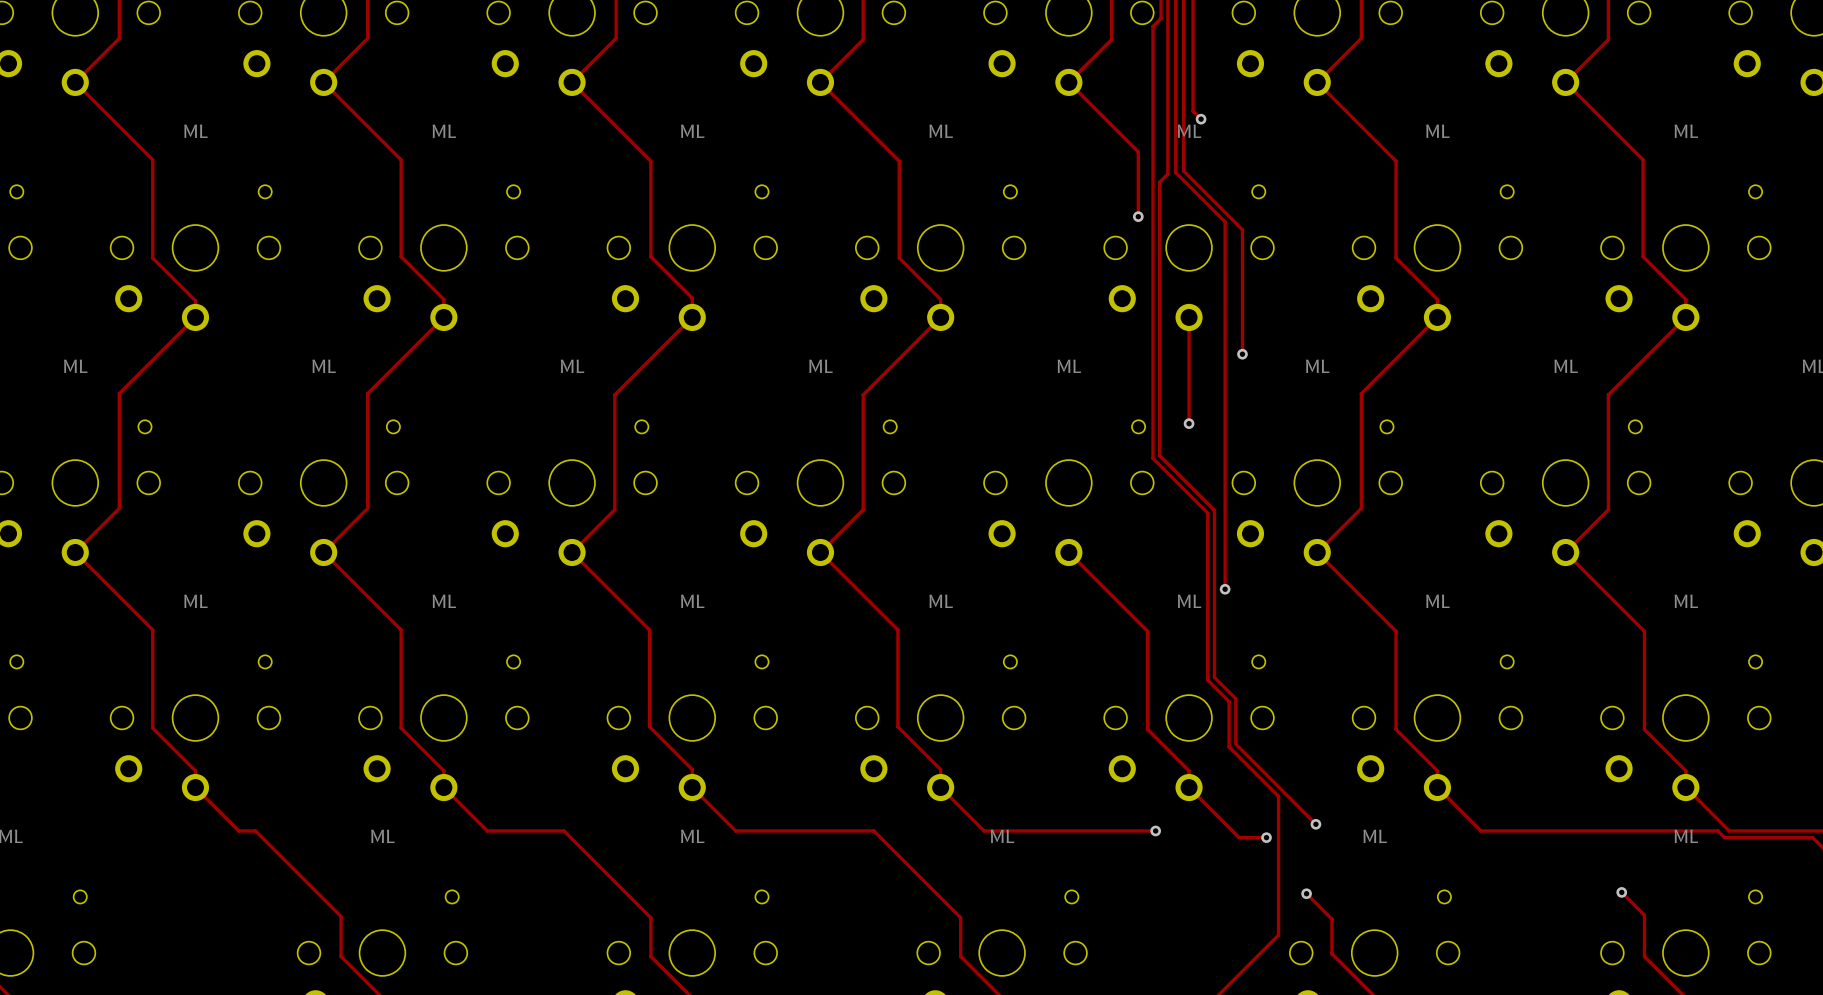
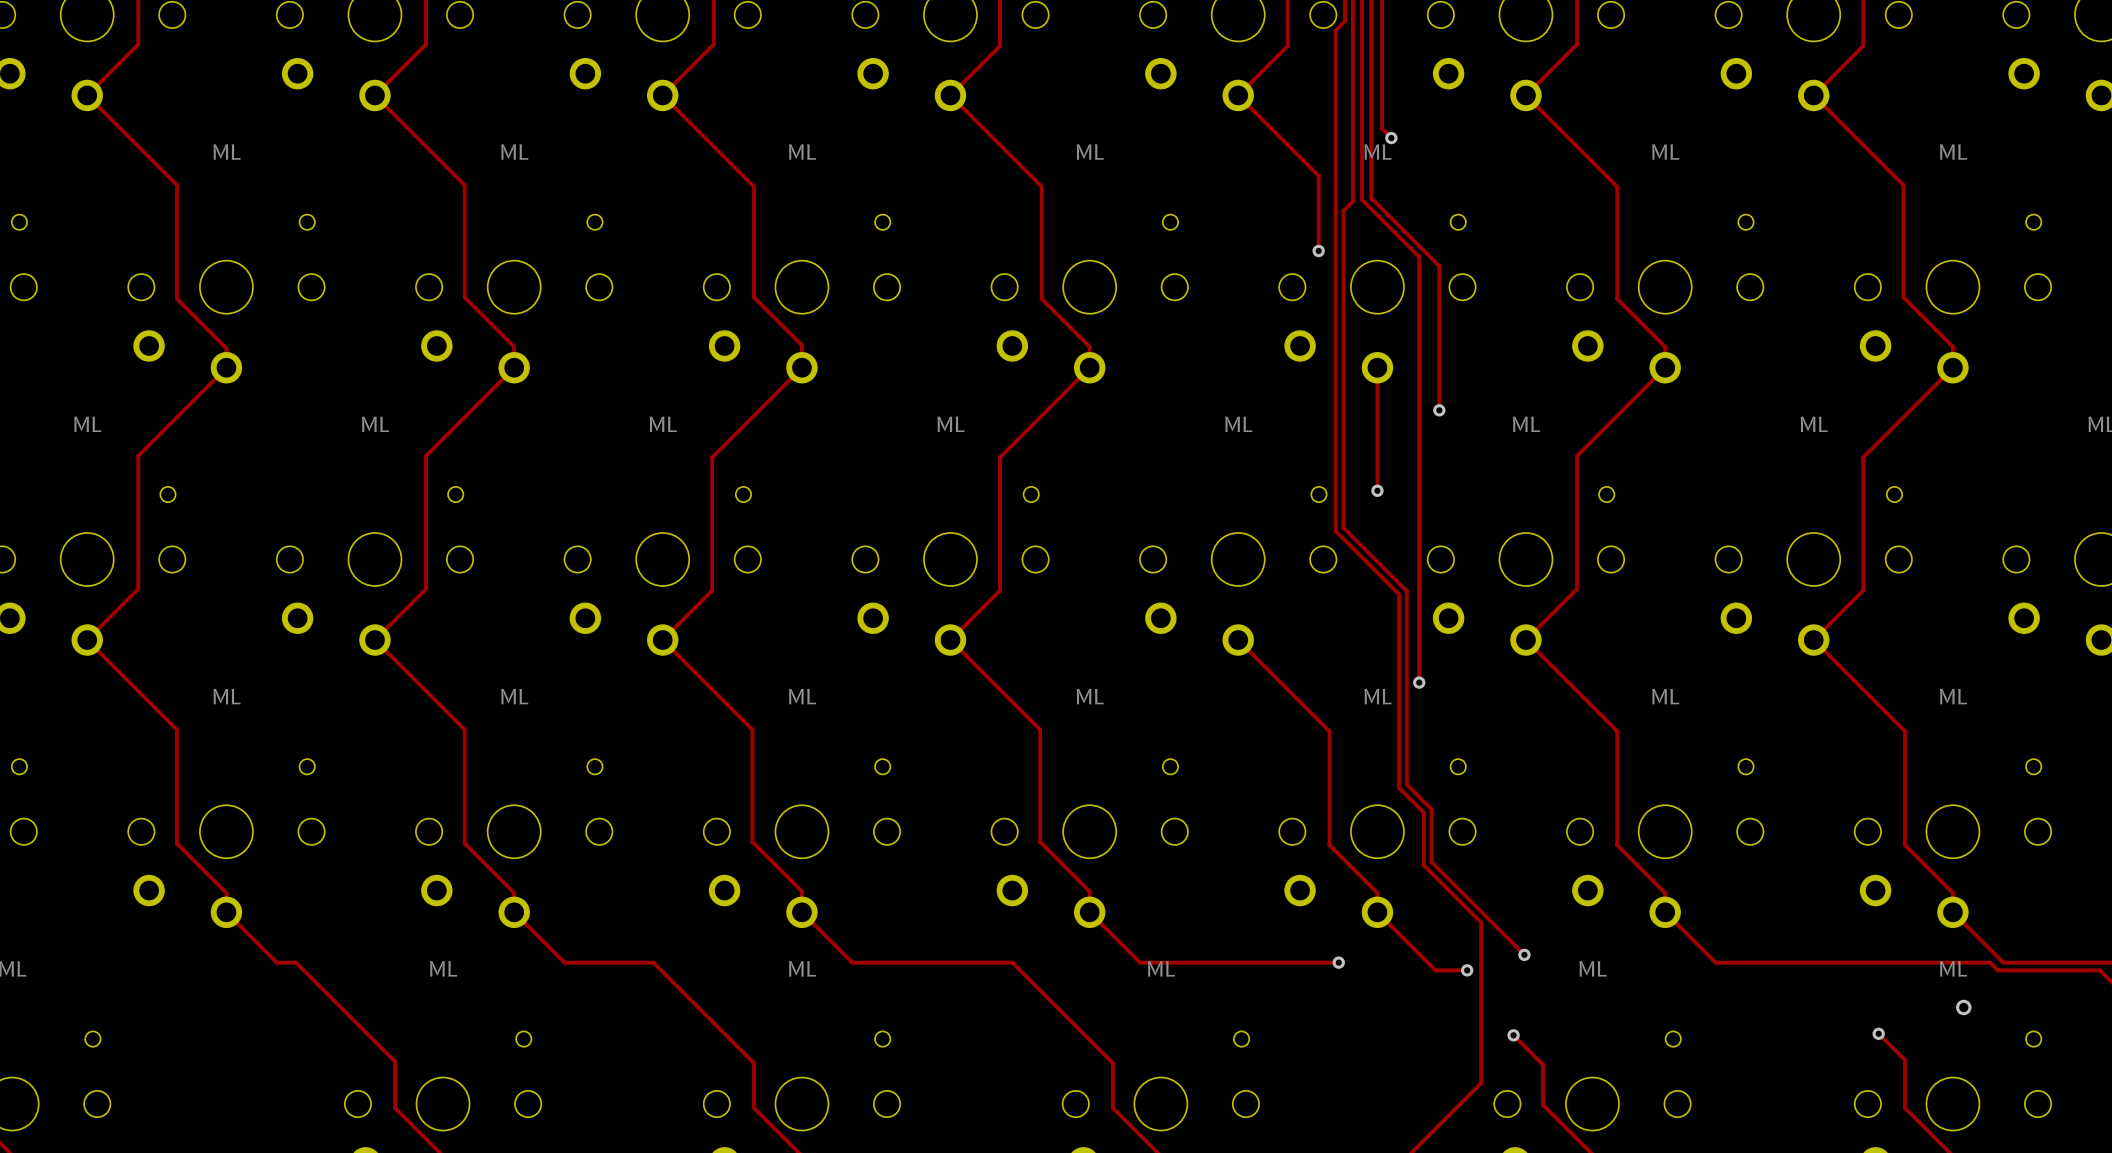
via: none -> (1963, 1007)

